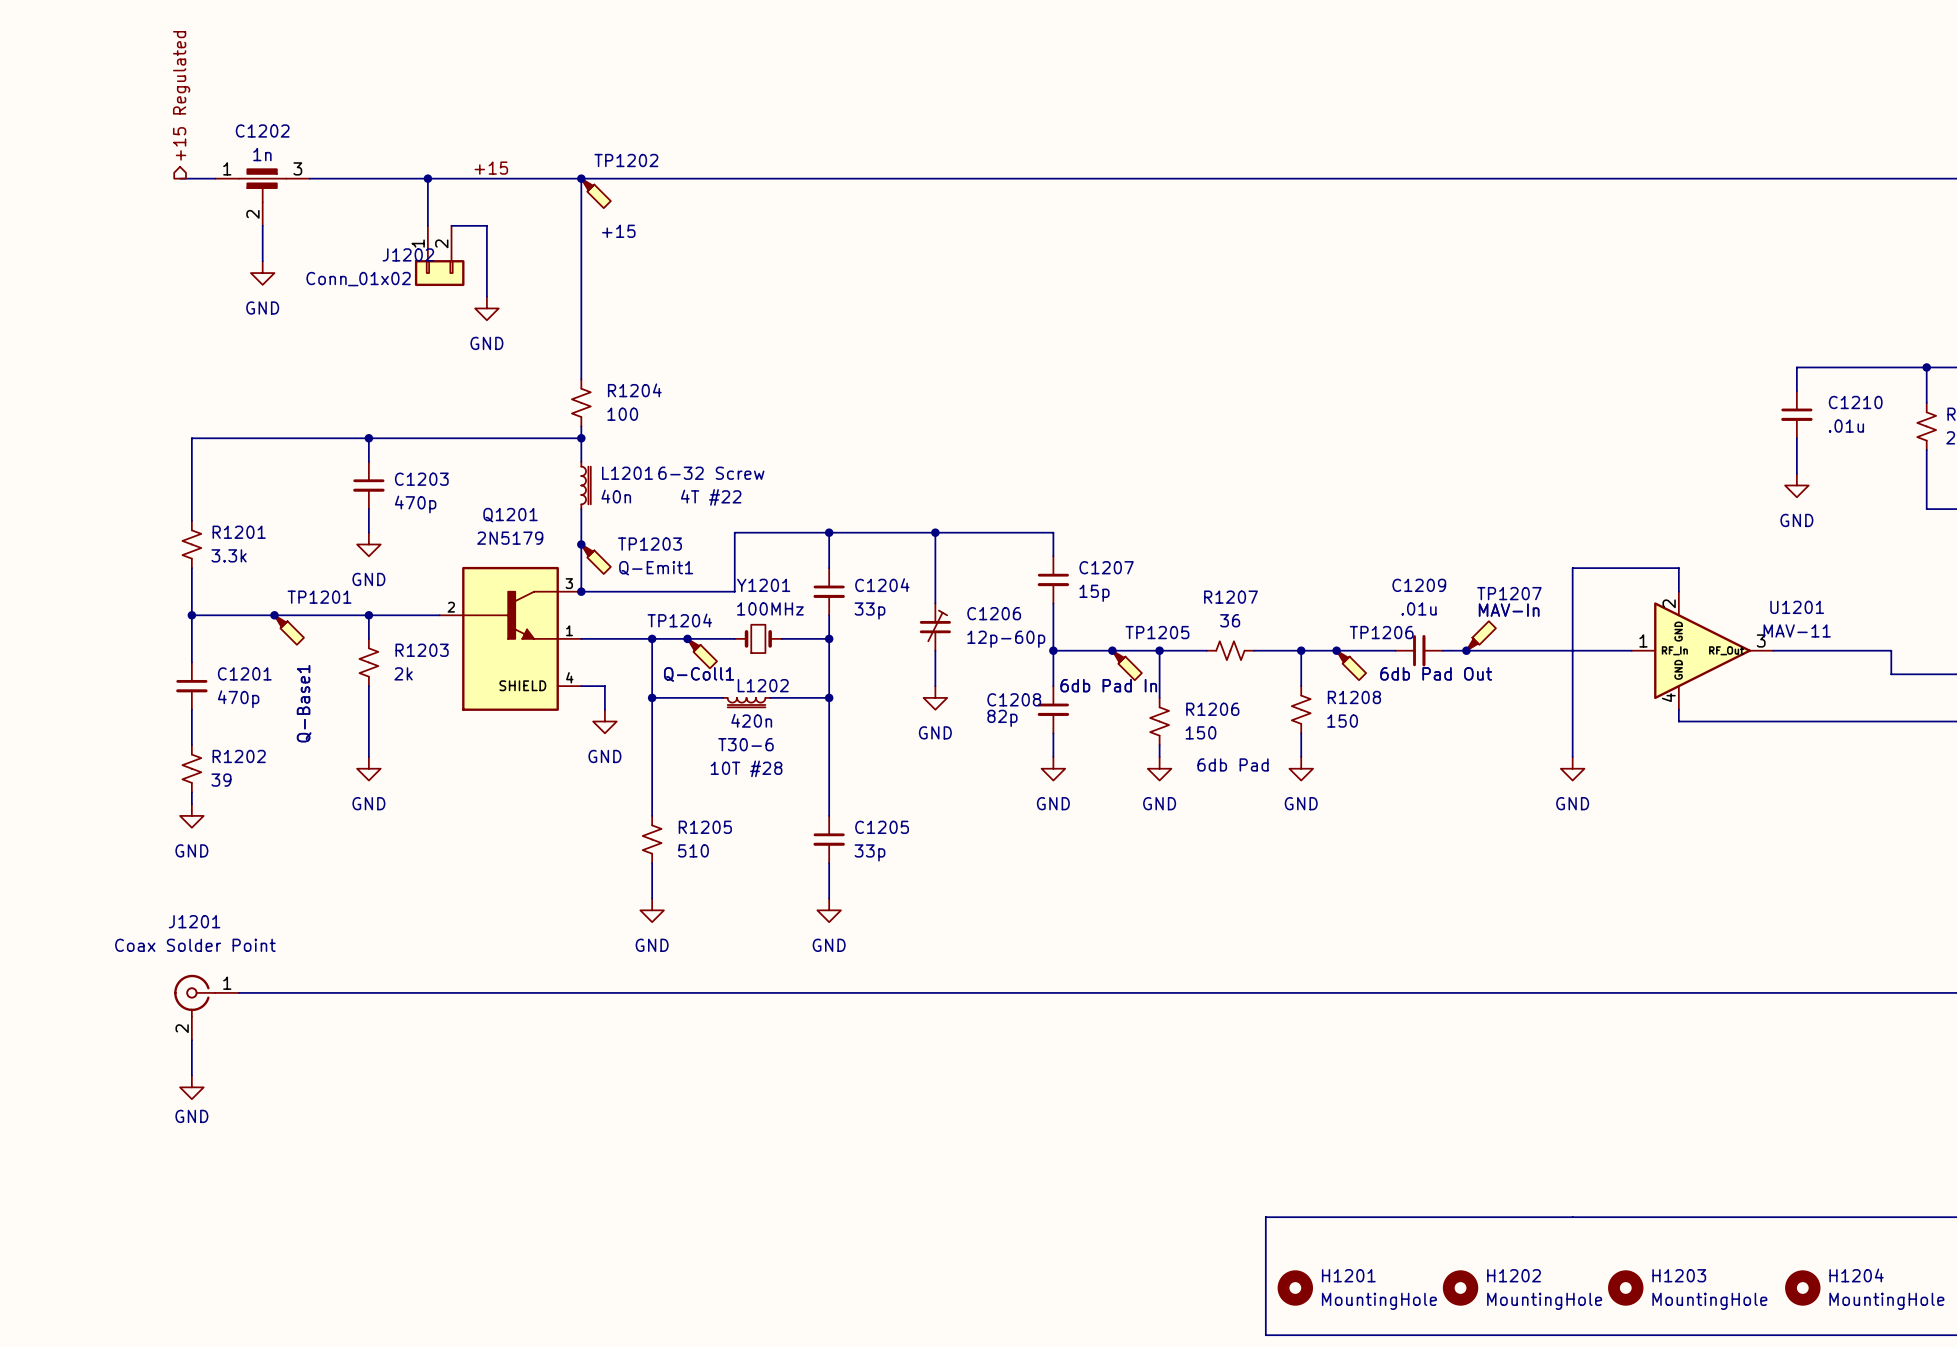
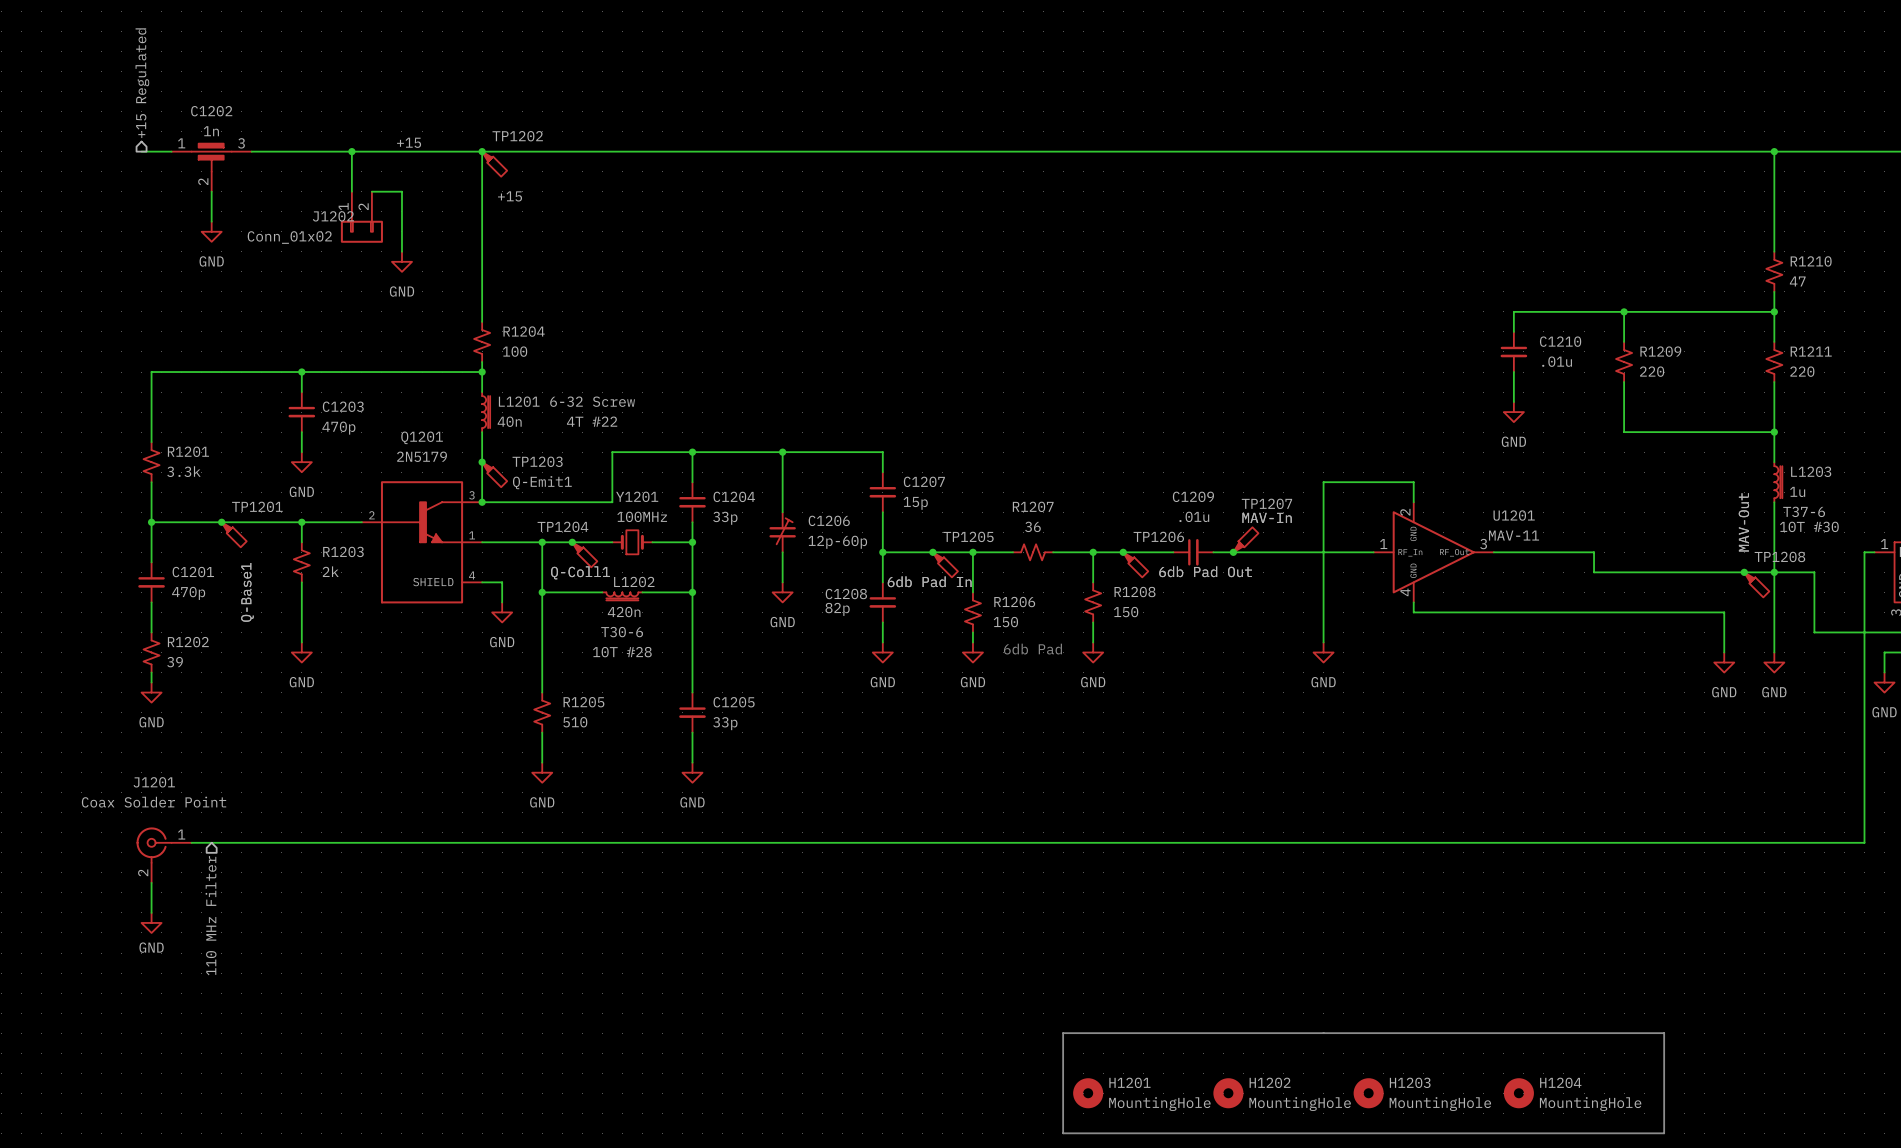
hierarchical label: none -> 110 MHz Filter (211, 915)

